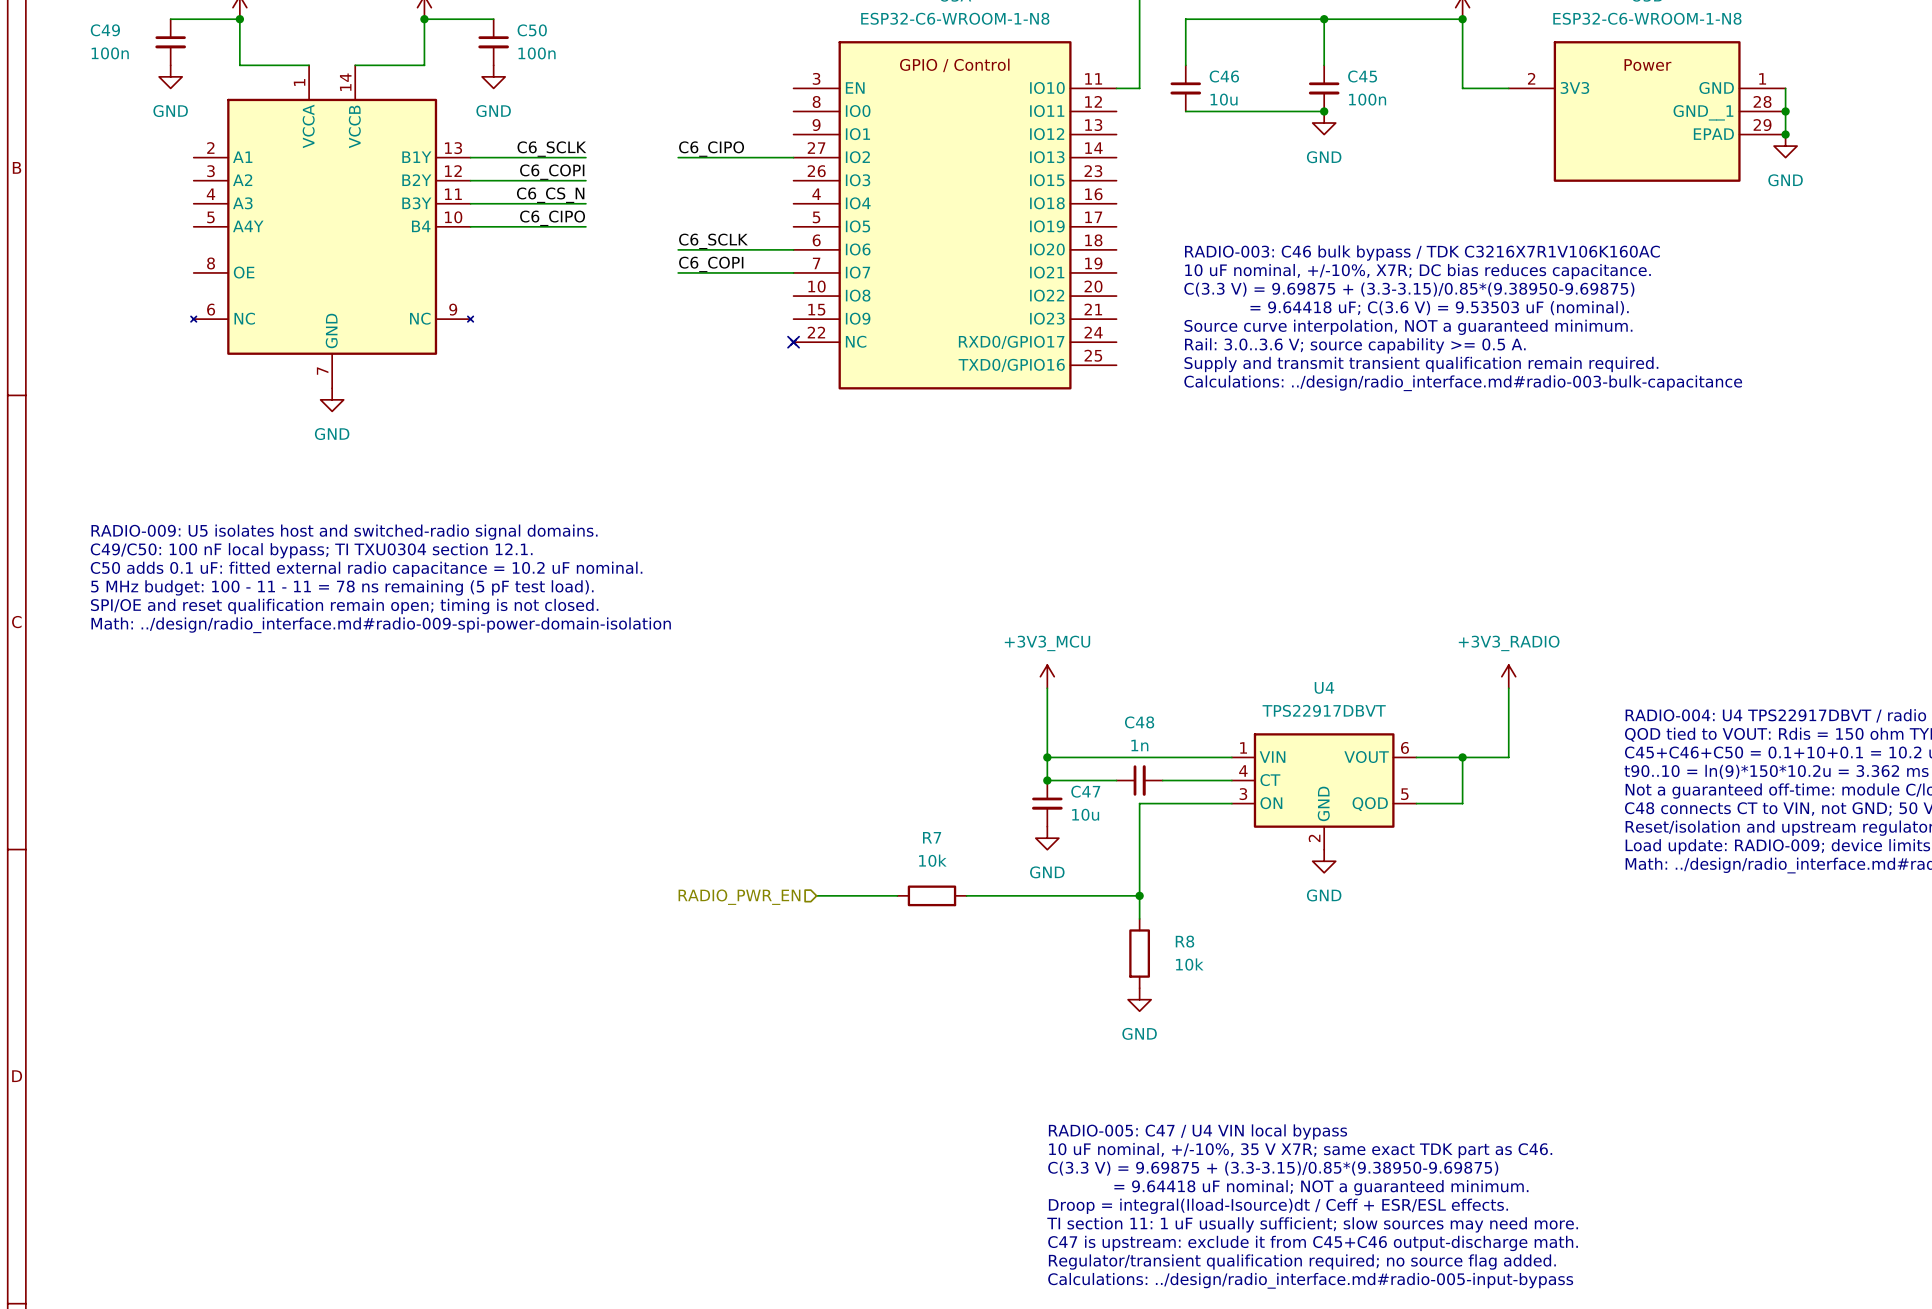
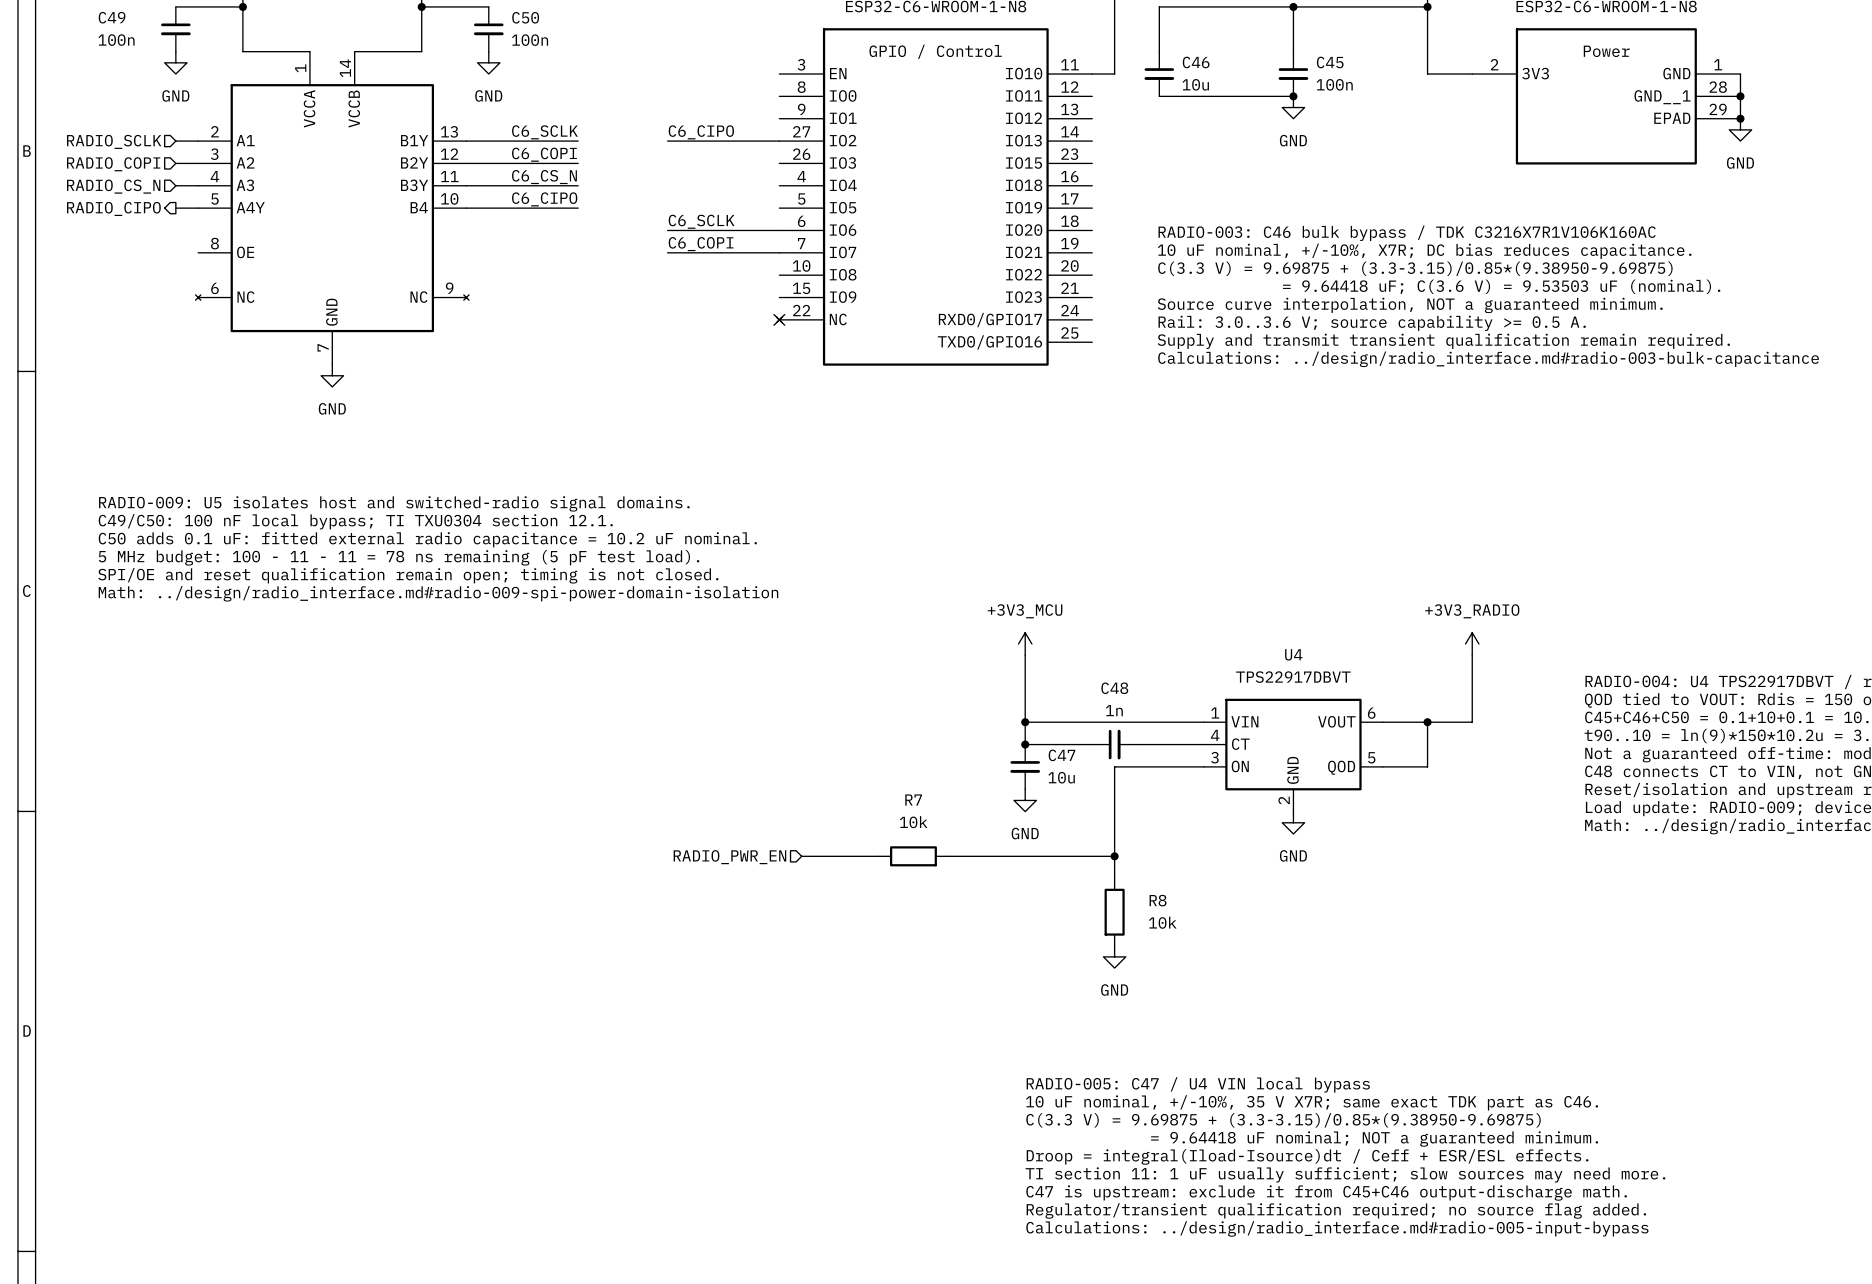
wire: none -> (175, 141) (198, 141)
hierarchical label: none -> RADIO_SCLK (114, 141)
wire: none -> (175, 163) (198, 163)
hierarchical label: none -> RADIO_COPI (113, 164)
wire: none -> (175, 185) (198, 185)
hierarchical label: none -> RADIO_CS_N (113, 186)
wire: none -> (175, 208) (198, 208)
hierarchical label: none -> RADIO_CIPO (113, 208)

